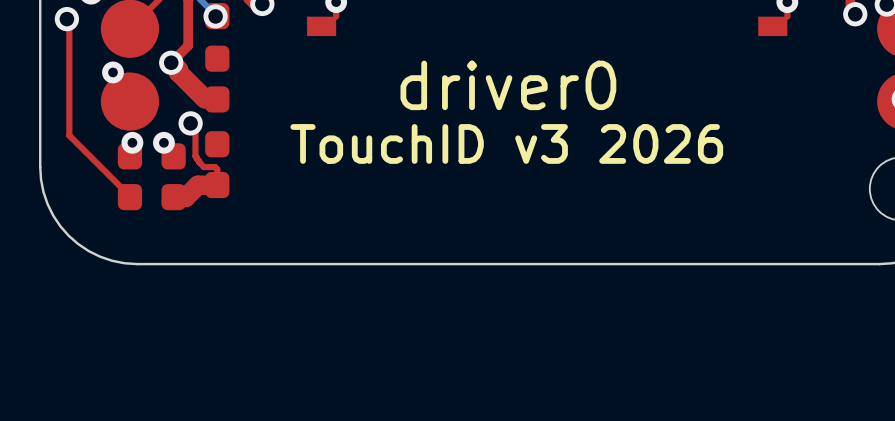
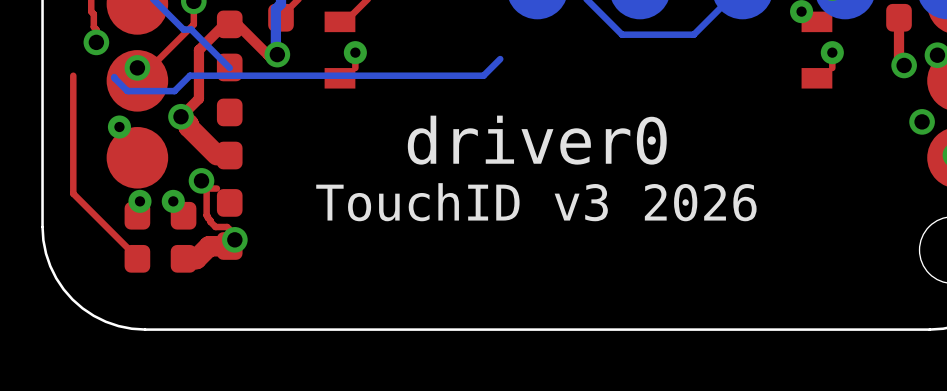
bottom track: none -> (500, 59) (483, 75) (189, 75) (174, 91) (127, 90) (114, 77)
via: none -> (137, 67)
via: (215, 16) -> none
via: (66, 19) -> none
via: none -> (922, 121)
top track: none -> (216, 188) (204, 188)
via: none -> (234, 239)

